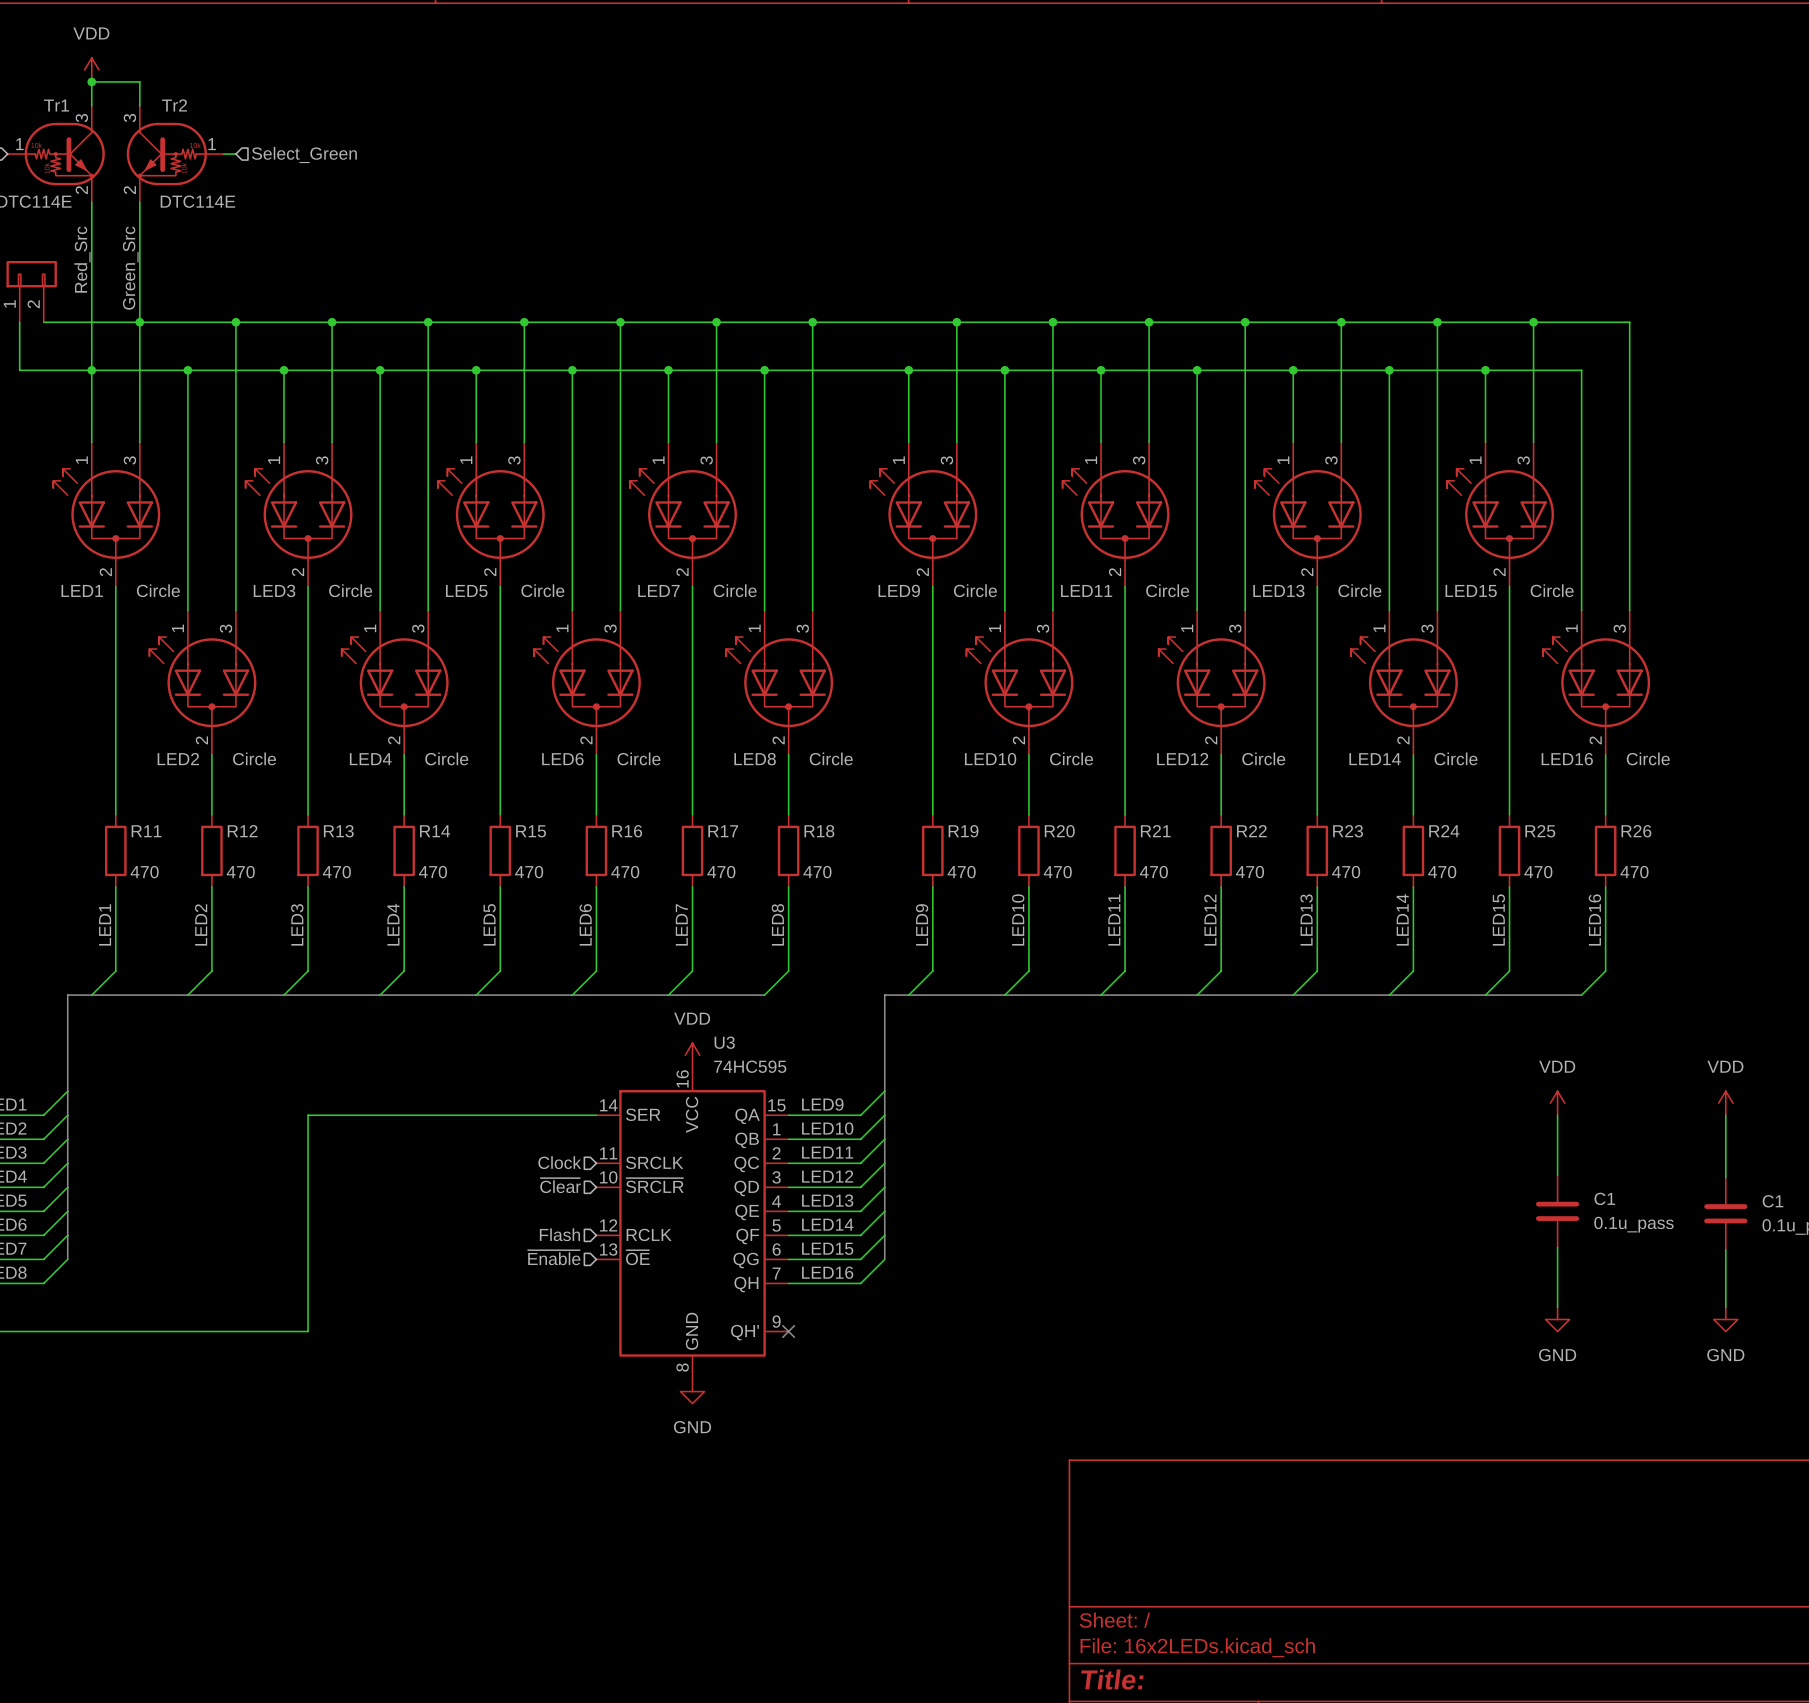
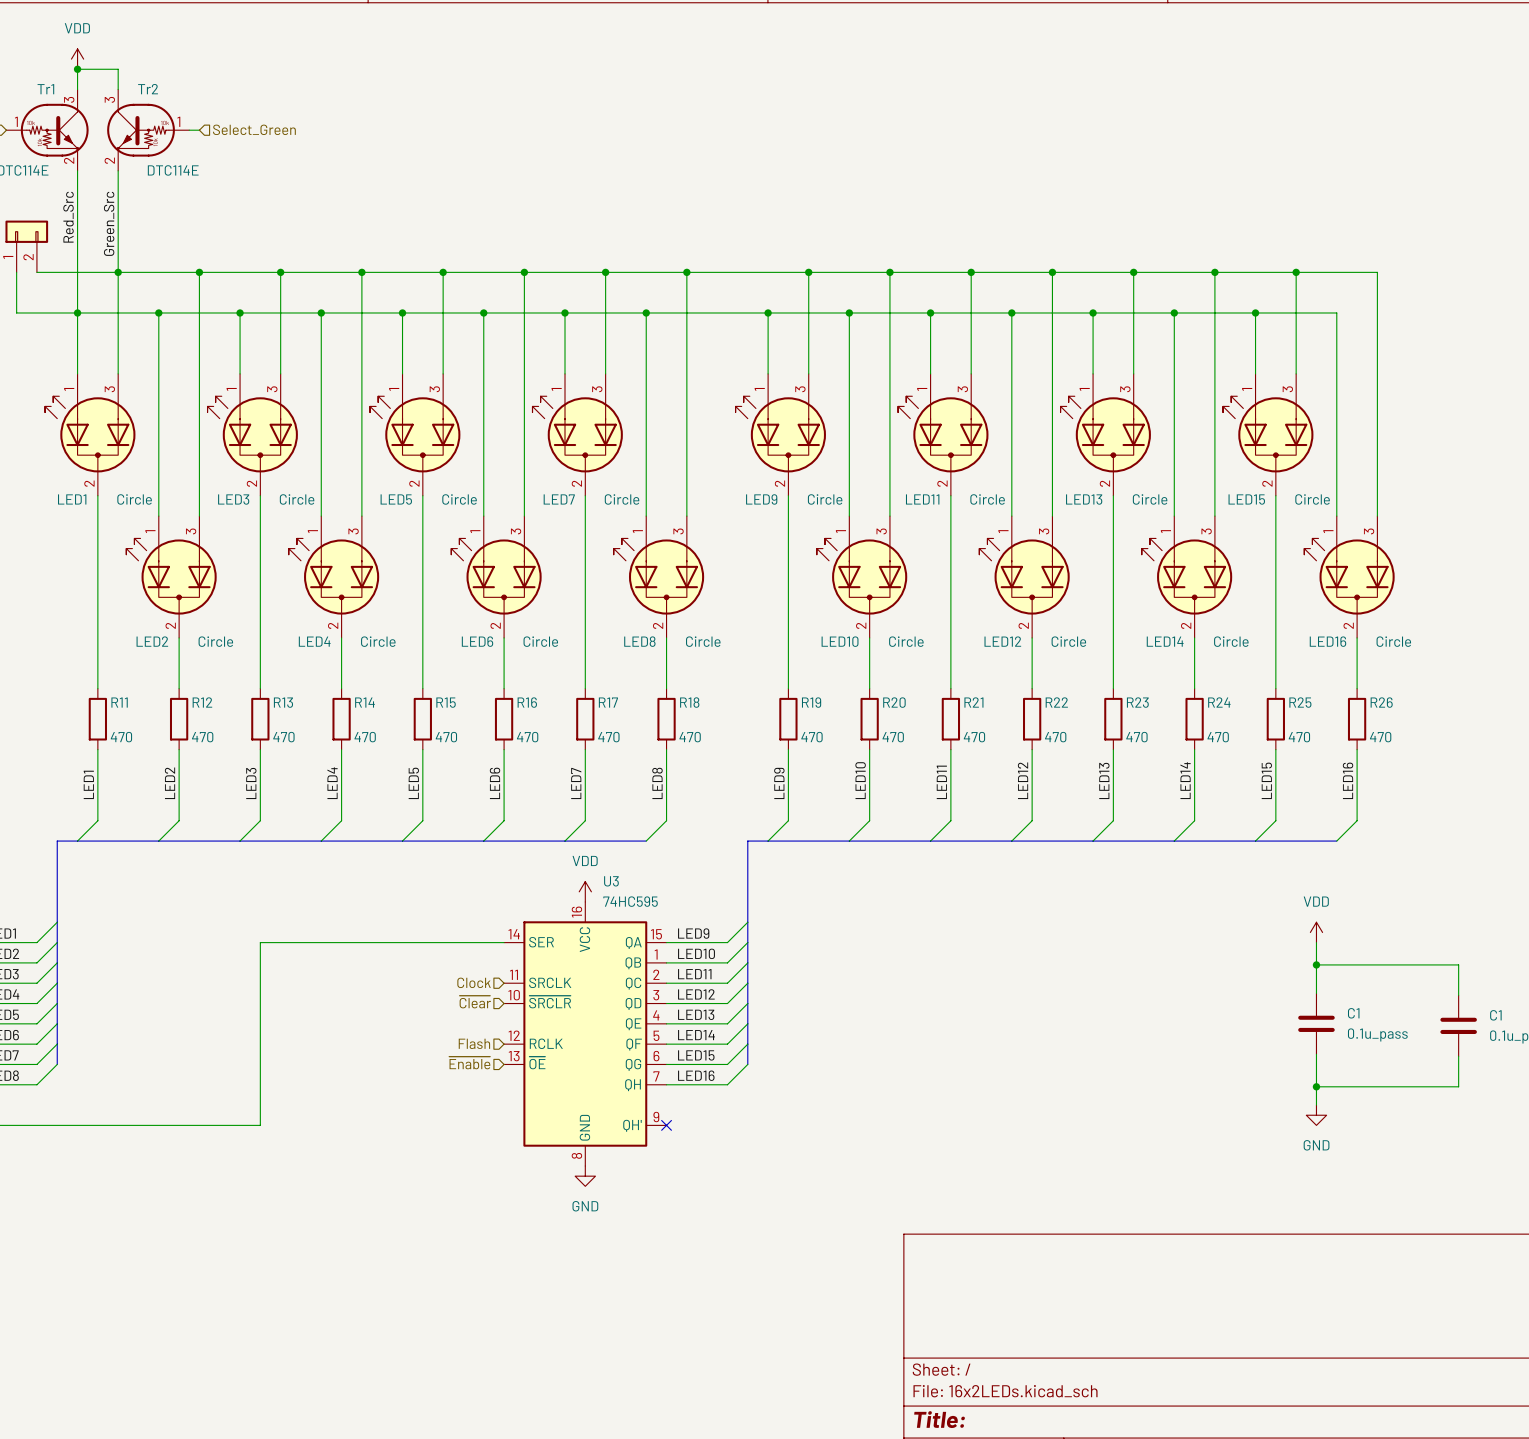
power symbol: VDD (1725, 1103) -> none
wire: (1725, 1115) (1725, 1141) -> (1316, 964) (1458, 964)
junction: none -> (1316, 964)
junction: none -> (1316, 1086)
wire: (1725, 1285) (1725, 1307) -> (1458, 1086) (1316, 1086)
power symbol: GND (1725, 1319) -> none

